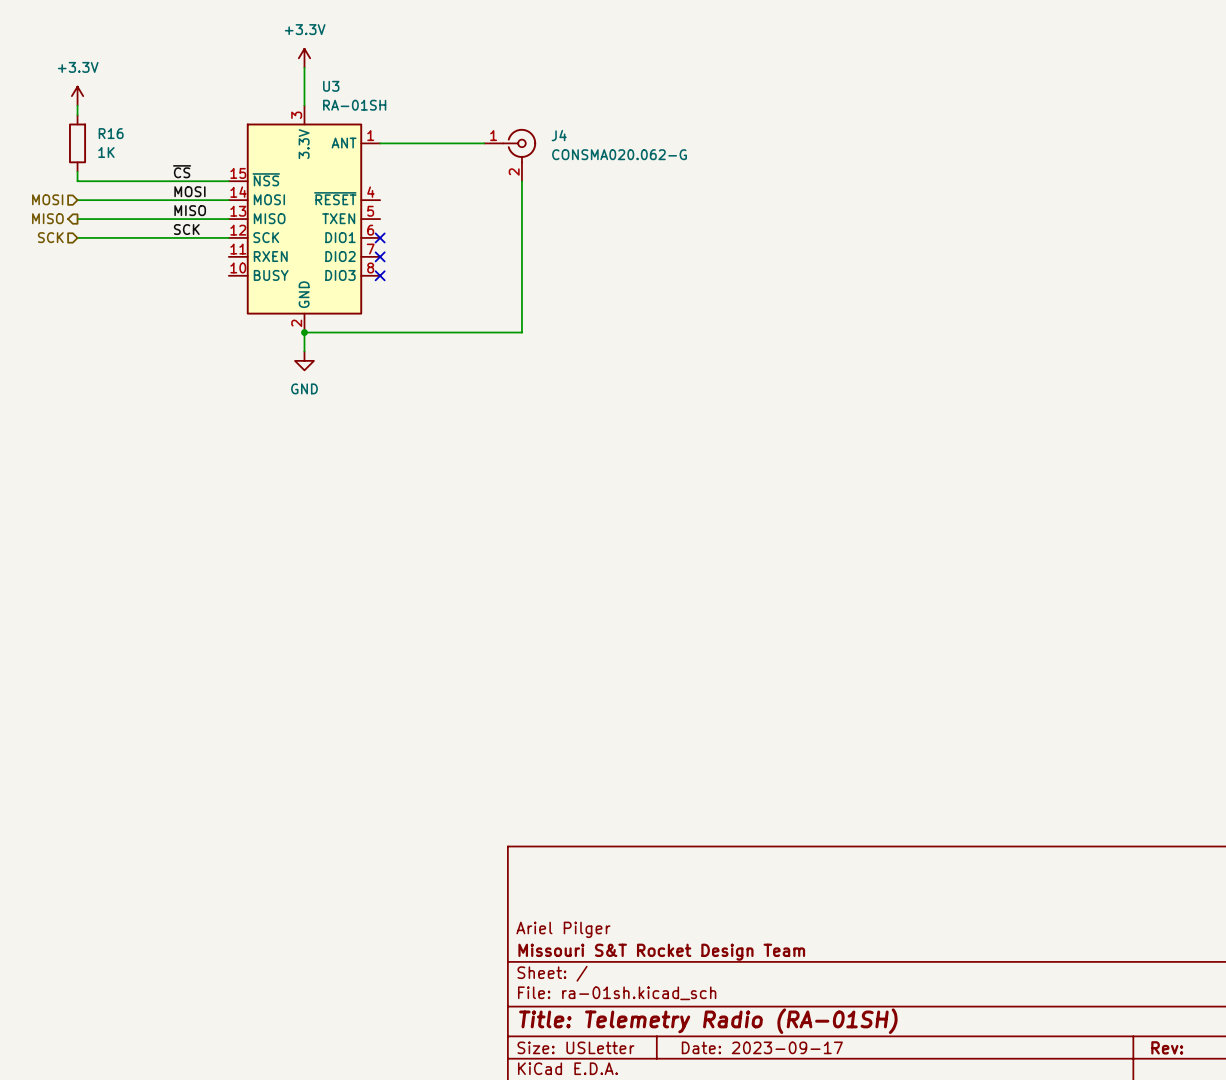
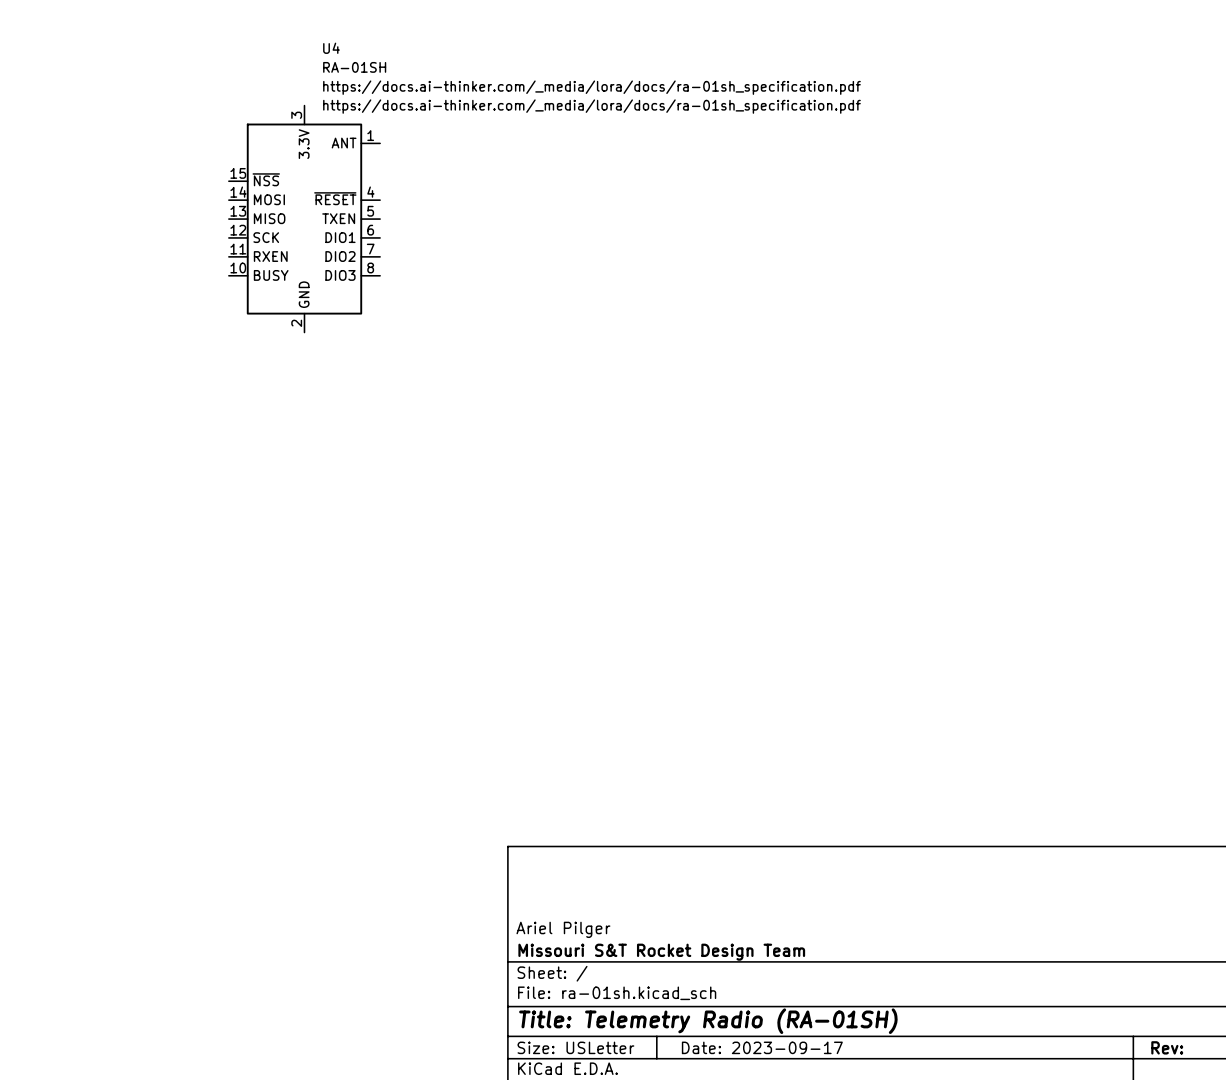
power symbol: +3.3V (304, 58) -> none
wire: (304, 67) (304, 105) -> none
U3 name: U3 (331, 86) -> U4 (331, 48)
U3 text: none -> https://docs.ai-thinker.com/_media/lora/docs/ra-01sh_specification.pdf (591, 87)
power symbol: +3.3V (77, 96) -> none
wire: (77, 105) (77, 115) -> none
U3 value position: RA-01SH (354, 105) -> RA-01SH (354, 67)
U3 text: none -> https://docs.ai-thinker.com/_media/lora/docs/ra-01sh_specification.pdf (591, 106)
R16: 1K (77, 143) -> none
wire: (380, 143) (484, 143) -> none
J4: CONSMA020.062-G (510, 155) -> none
wire: (77, 171) (77, 181) (228, 181) -> none
label: ~{CS} (182, 171) -> none
wire: (521, 181) (521, 332) (304, 332) (304, 351) -> none
label: MOSI (189, 191) -> none
hierarchical label: MOSI (47, 199) -> none
wire: (77, 200) (228, 200) -> none
label: MISO (190, 210) -> none
hierarchical label: MISO (47, 218) -> none
wire: (77, 219) (228, 219) -> none
label: SCK (186, 229) -> none
hierarchical label: SCK (50, 237) -> none
wire: (77, 237) (228, 237) -> none
no-connect mark: (380, 237) -> none
no-connect mark: (380, 256) -> none
no-connect mark: (380, 275) -> none
junction: (304, 332) -> none
power symbol: GND (304, 360) -> none

